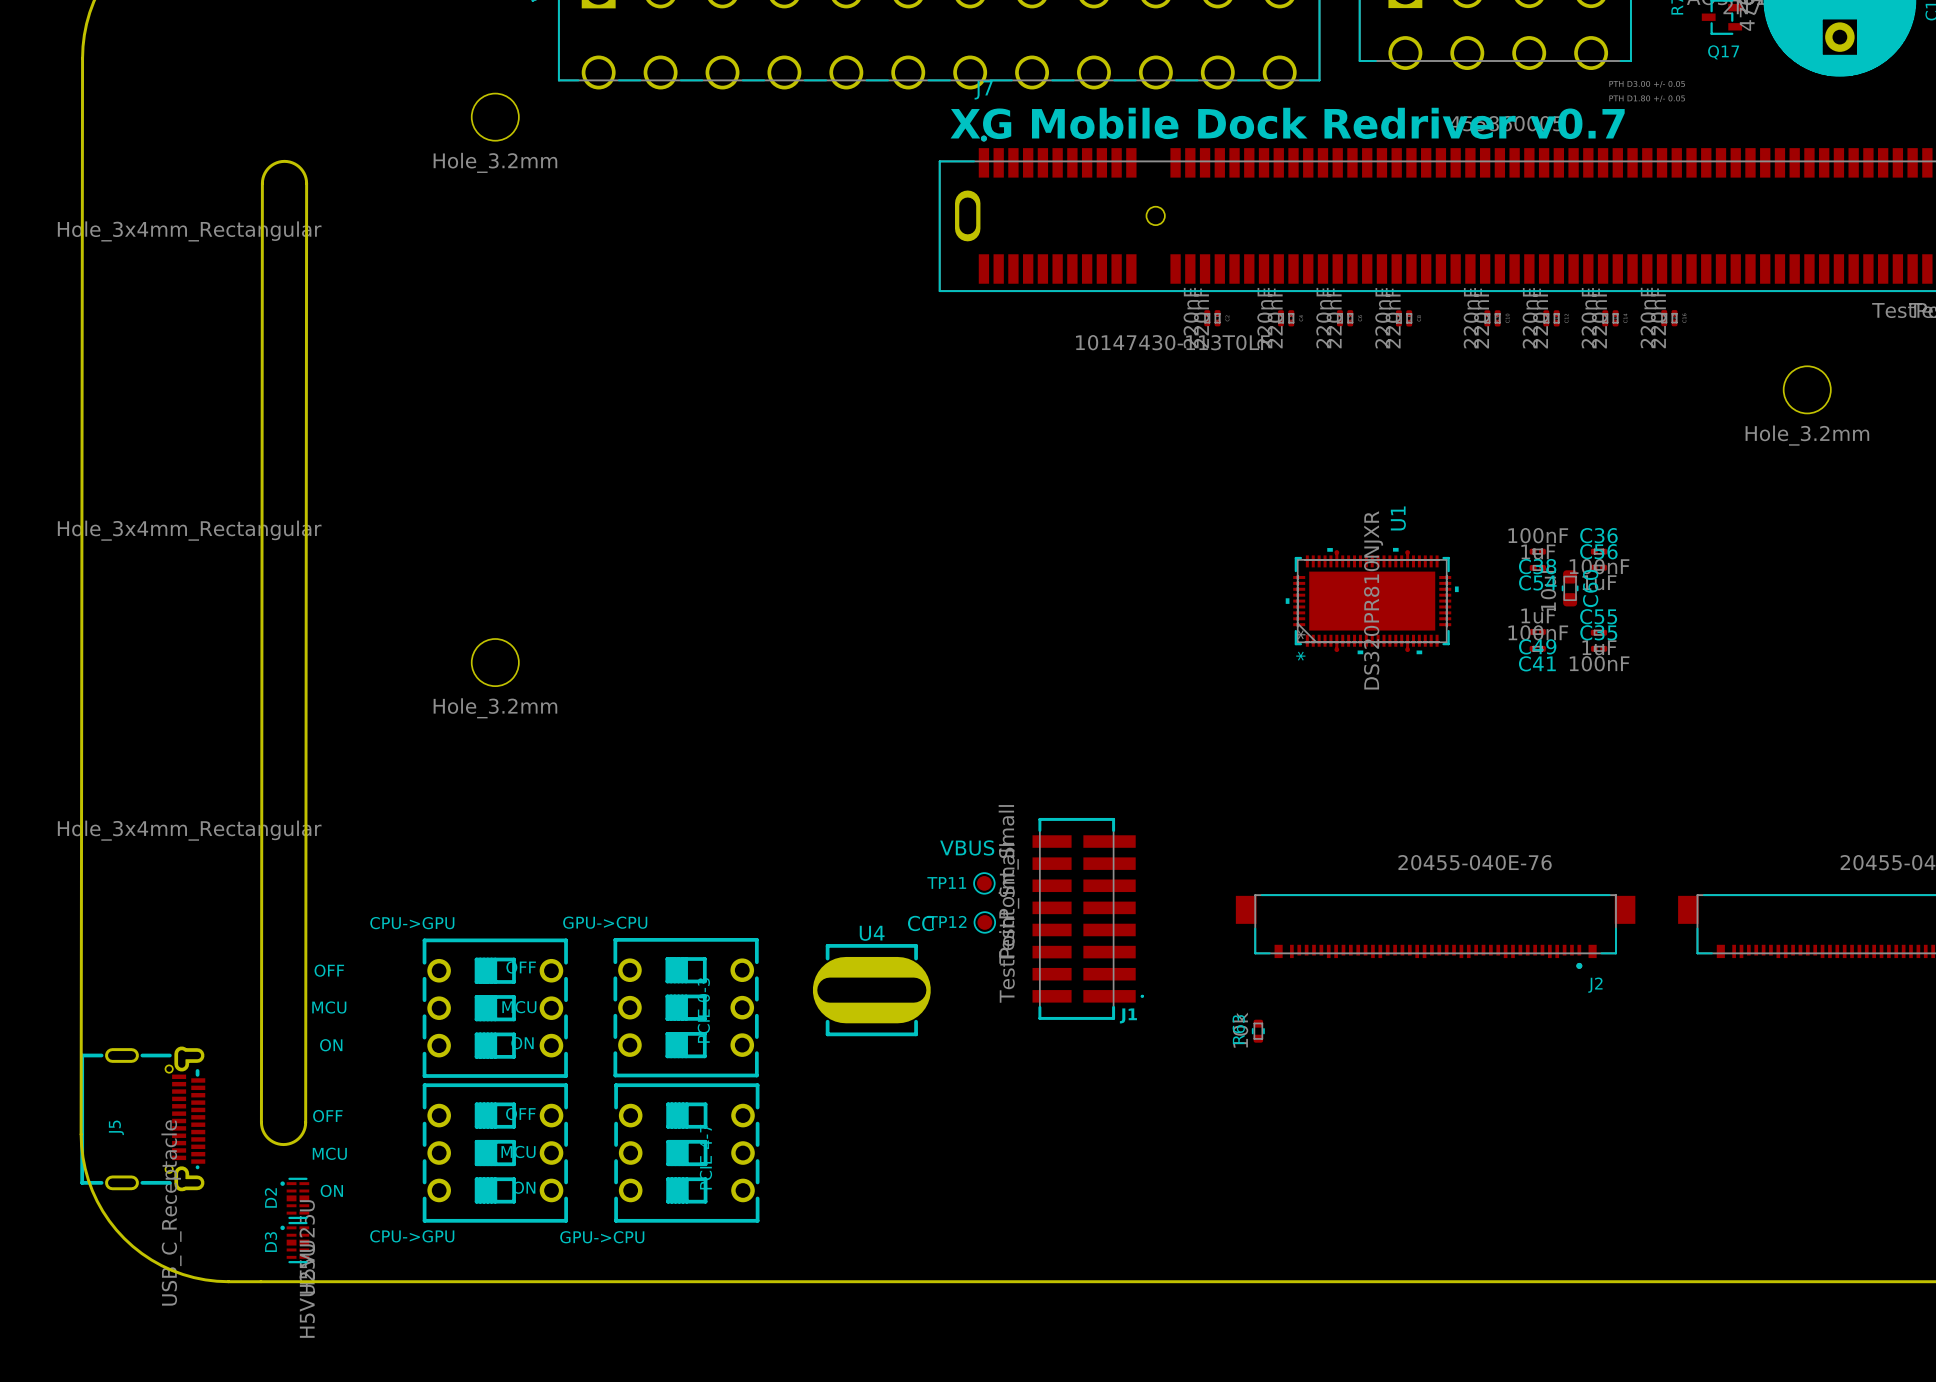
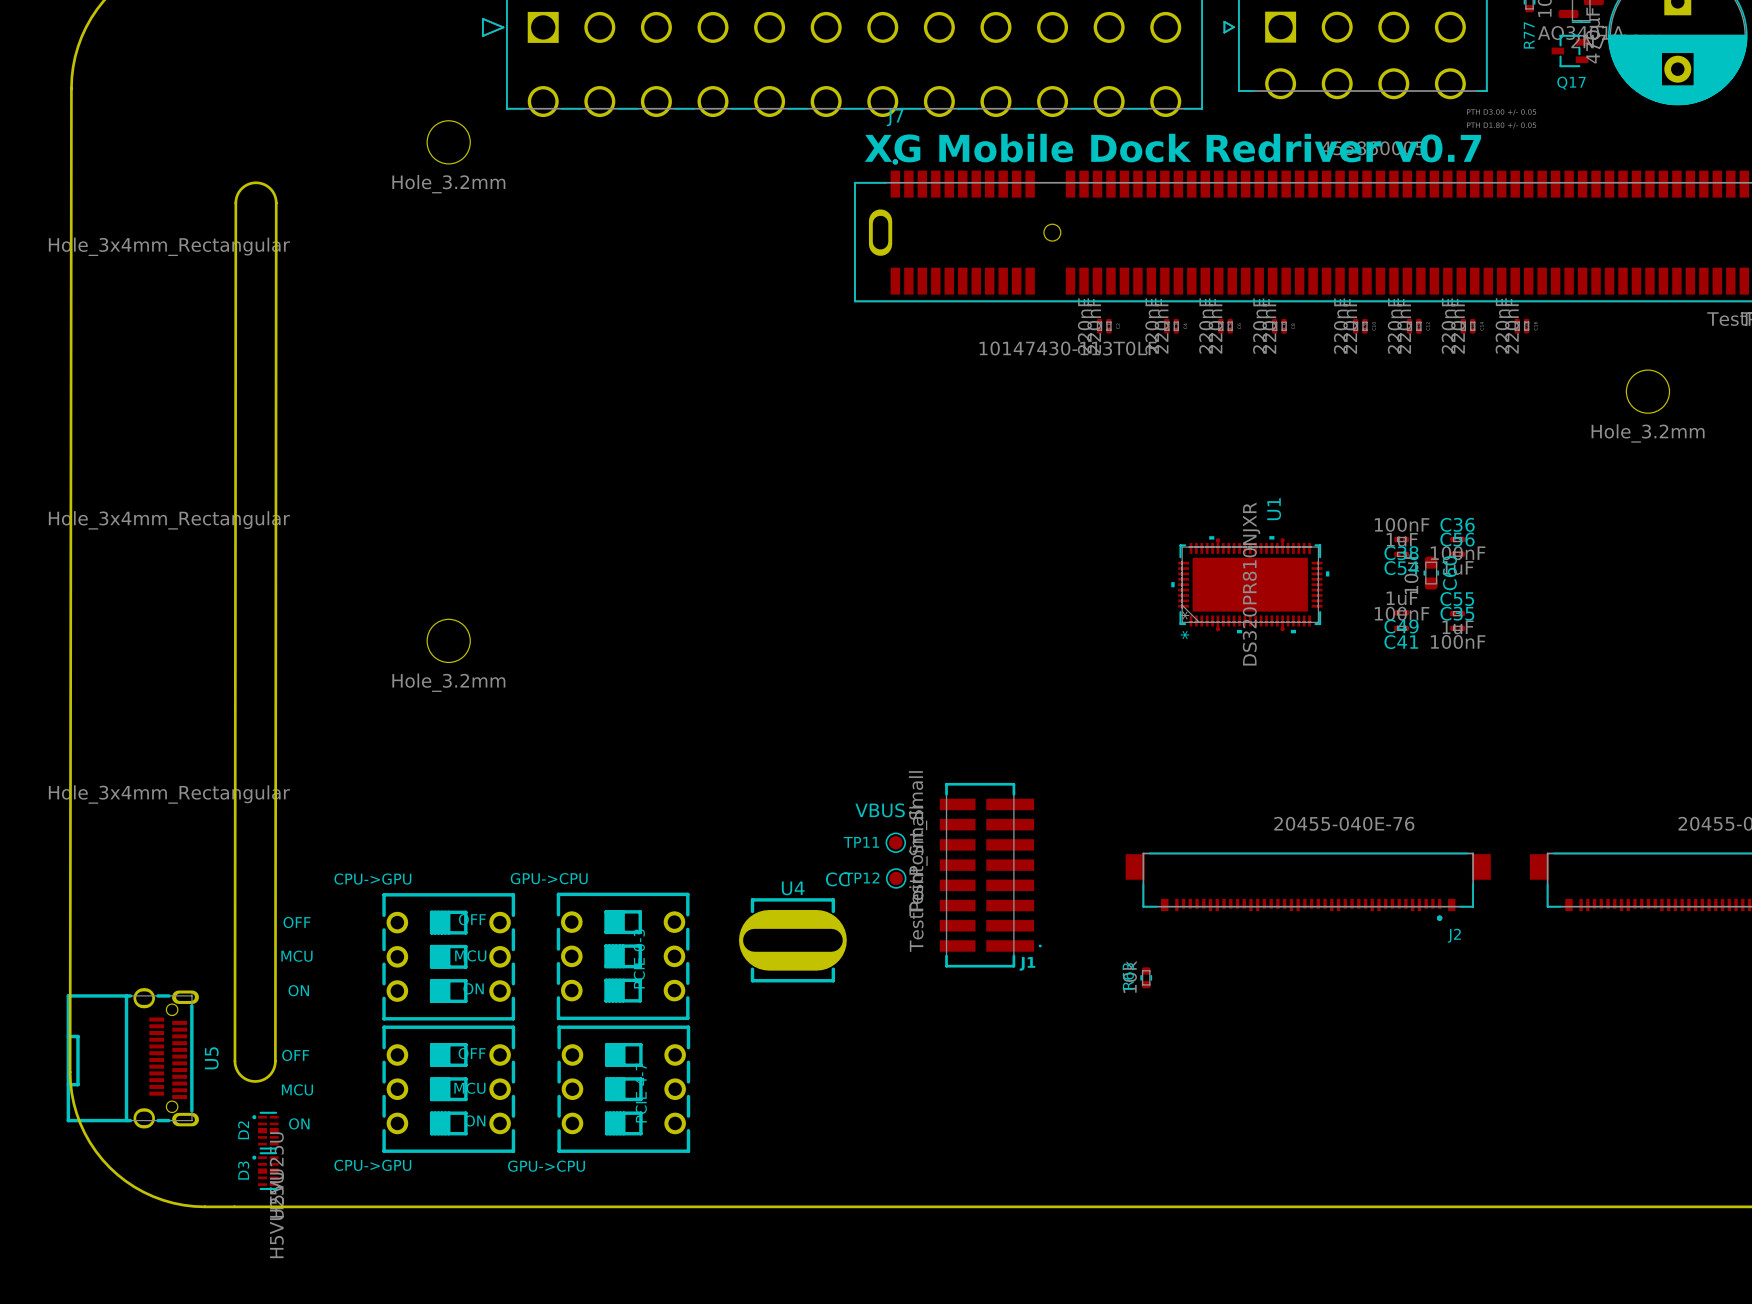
J5: USB_C_Receptacle (142, 1118) -> none
U5: none -> (132, 1058)

